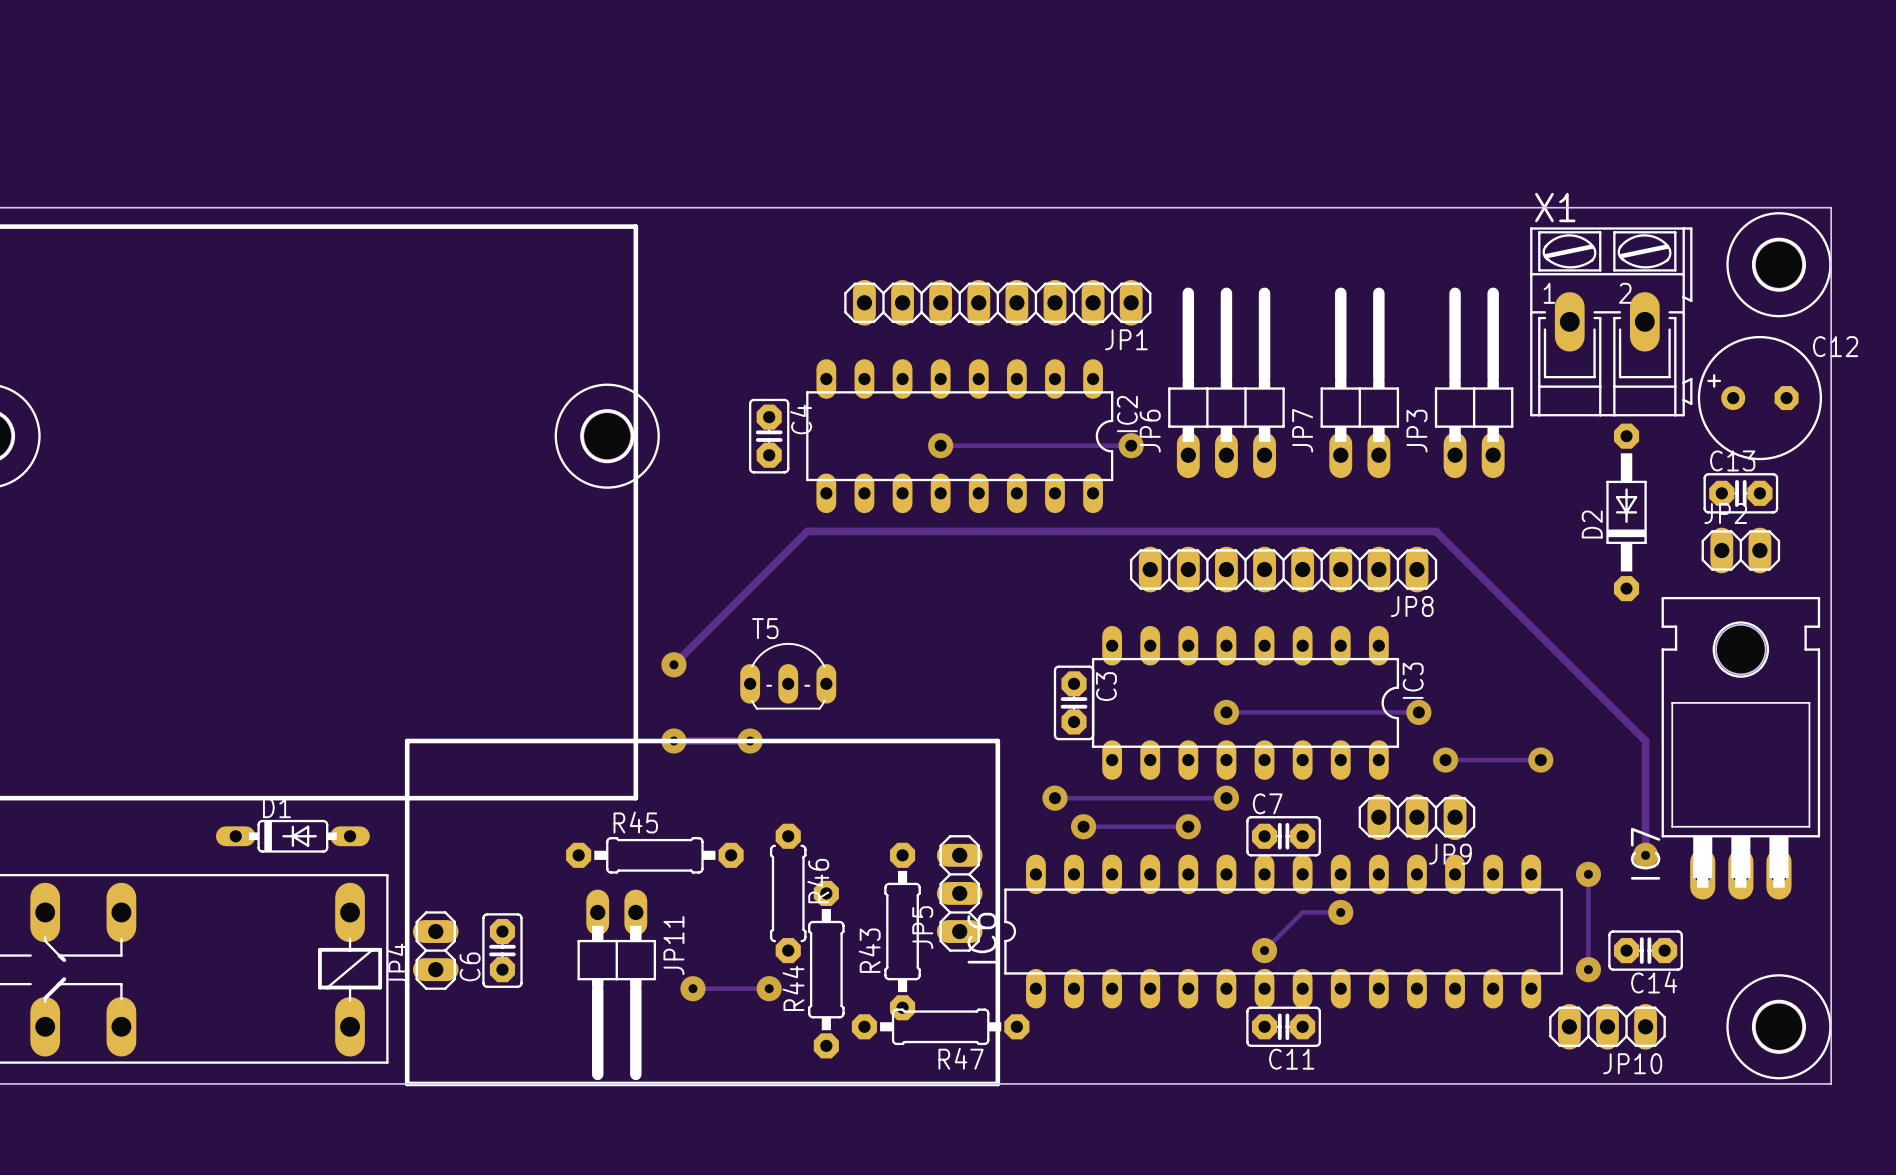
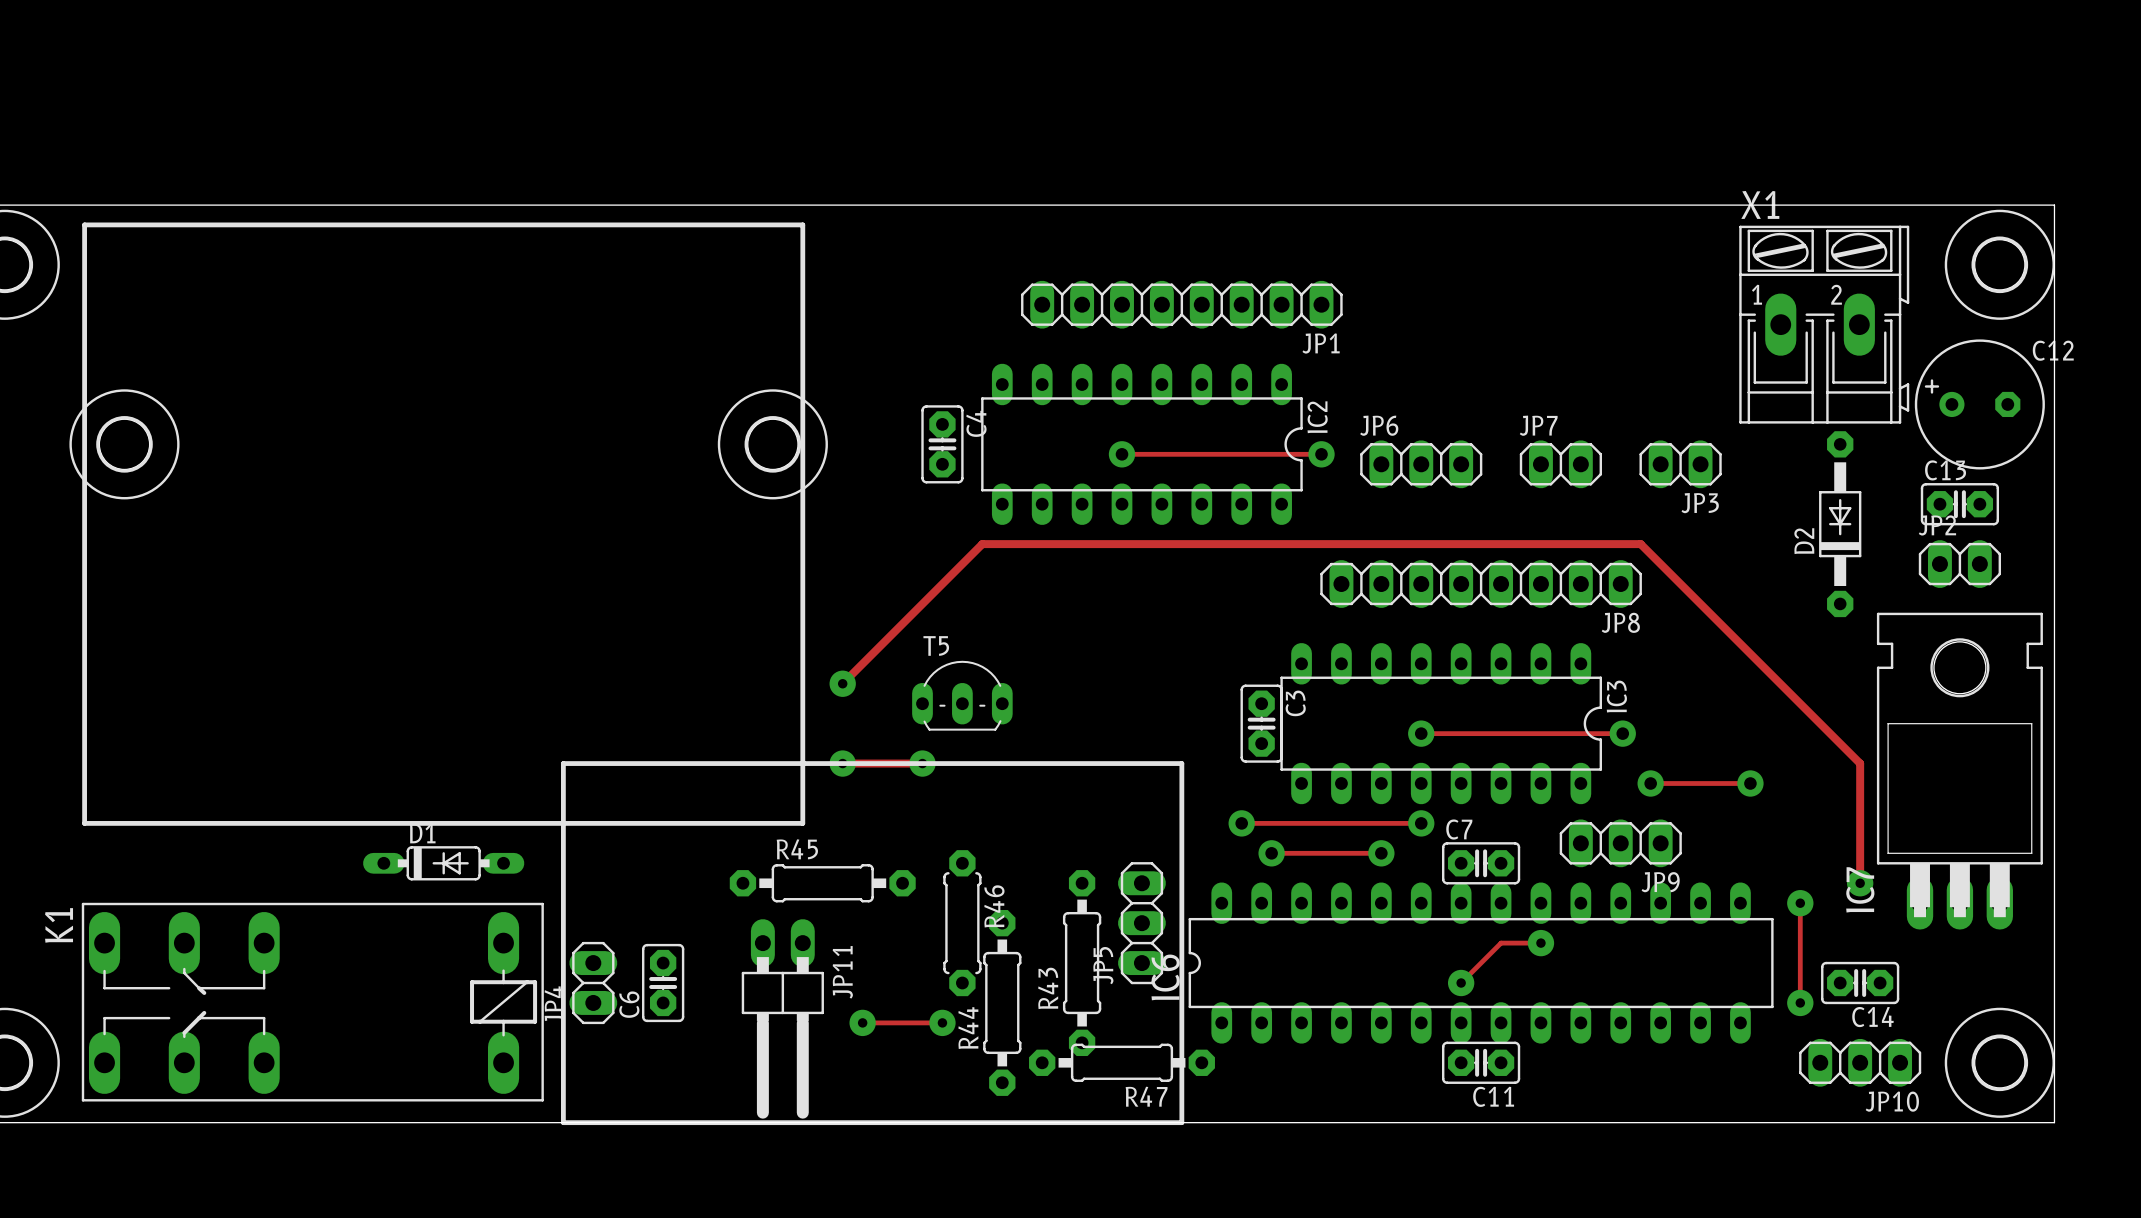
JP6 footprint: [1168, 287, 1285, 479] -> [1360, 440, 1483, 489]
JP7 footprint: [1320, 287, 1400, 479] -> [1519, 440, 1603, 489]
JP3 footprint: [1434, 287, 1514, 479] -> [1639, 440, 1722, 489]
JP7 name position: JP7 (1302, 430) -> JP7 (1538, 425)
JP6 name position: JP6 (1150, 431) -> JP6 (1379, 425)
JP3 name position: JP3 (1416, 431) -> JP3 (1700, 503)
JP10 position: (1607, 1026) -> (1860, 1062)

